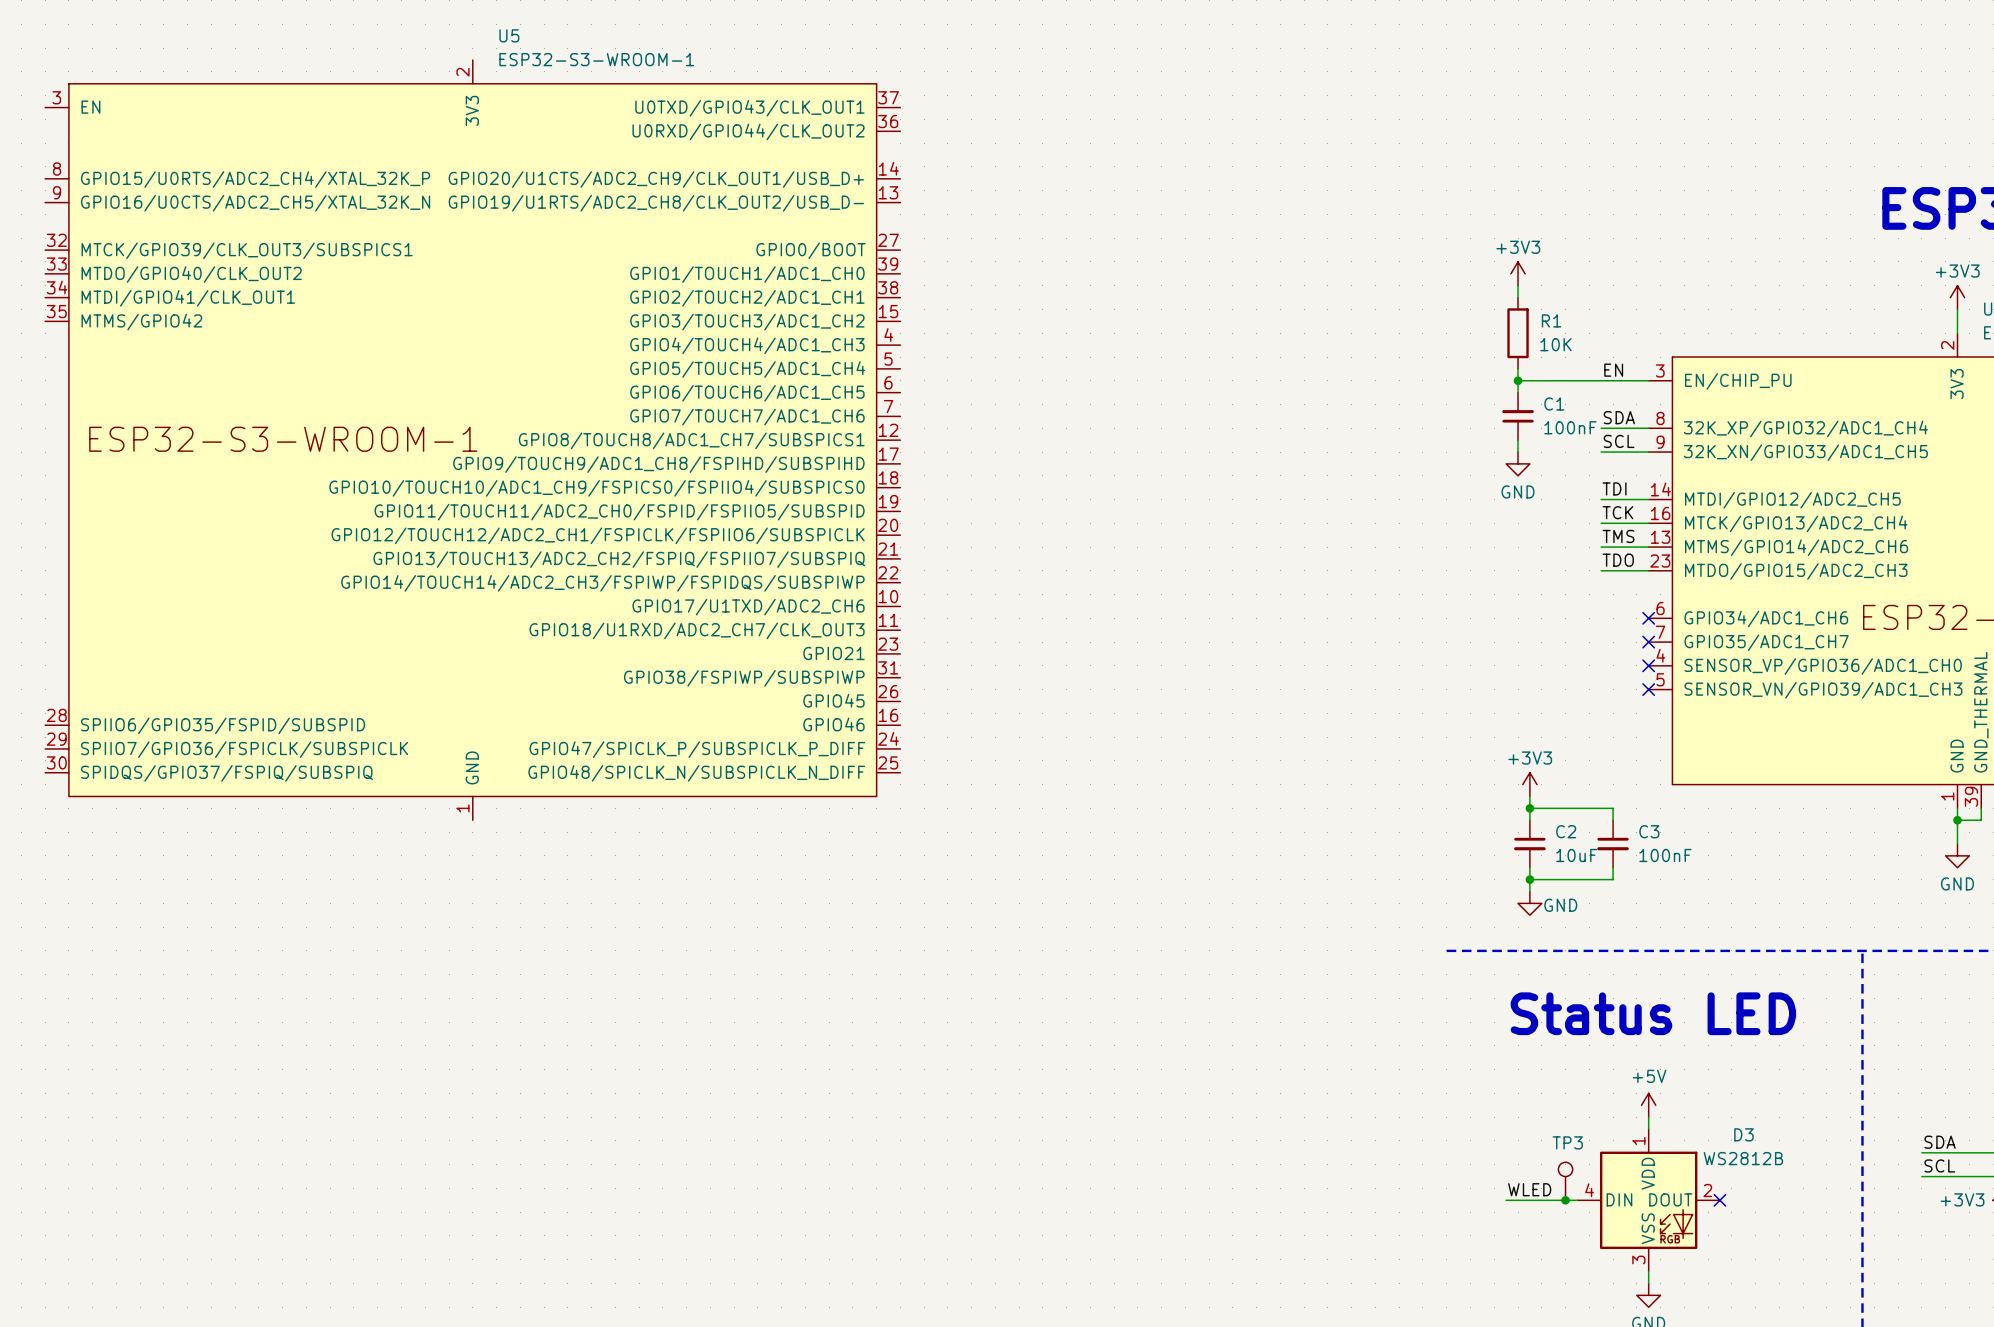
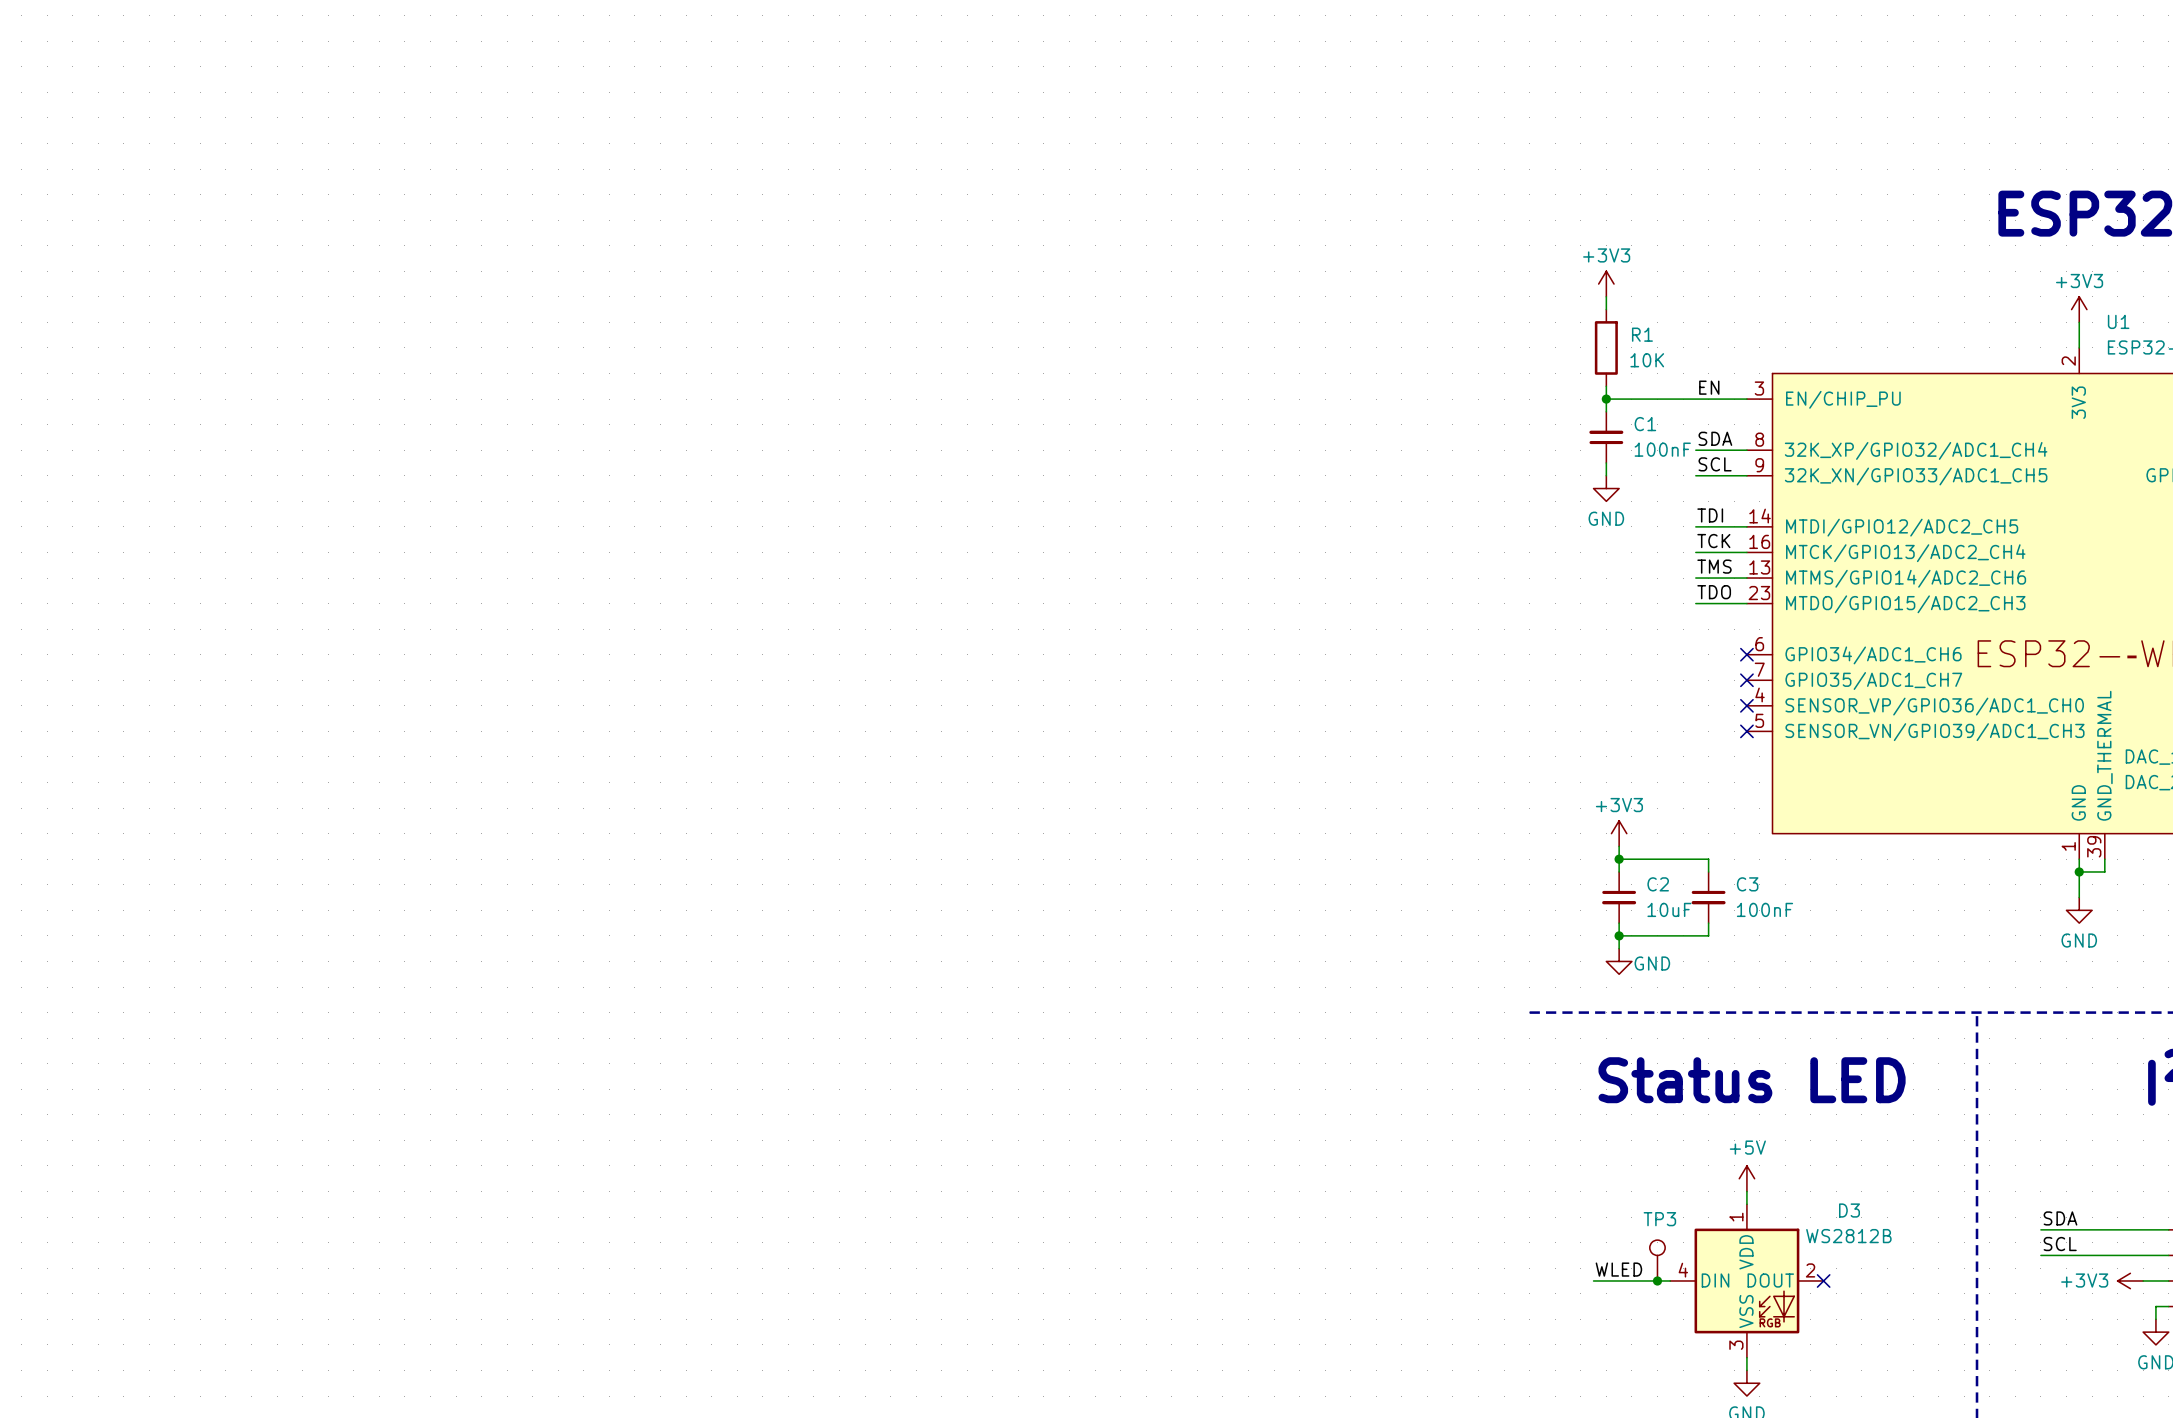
U5: ESP32-S3-WROOM-1 (472, 440) -> none

